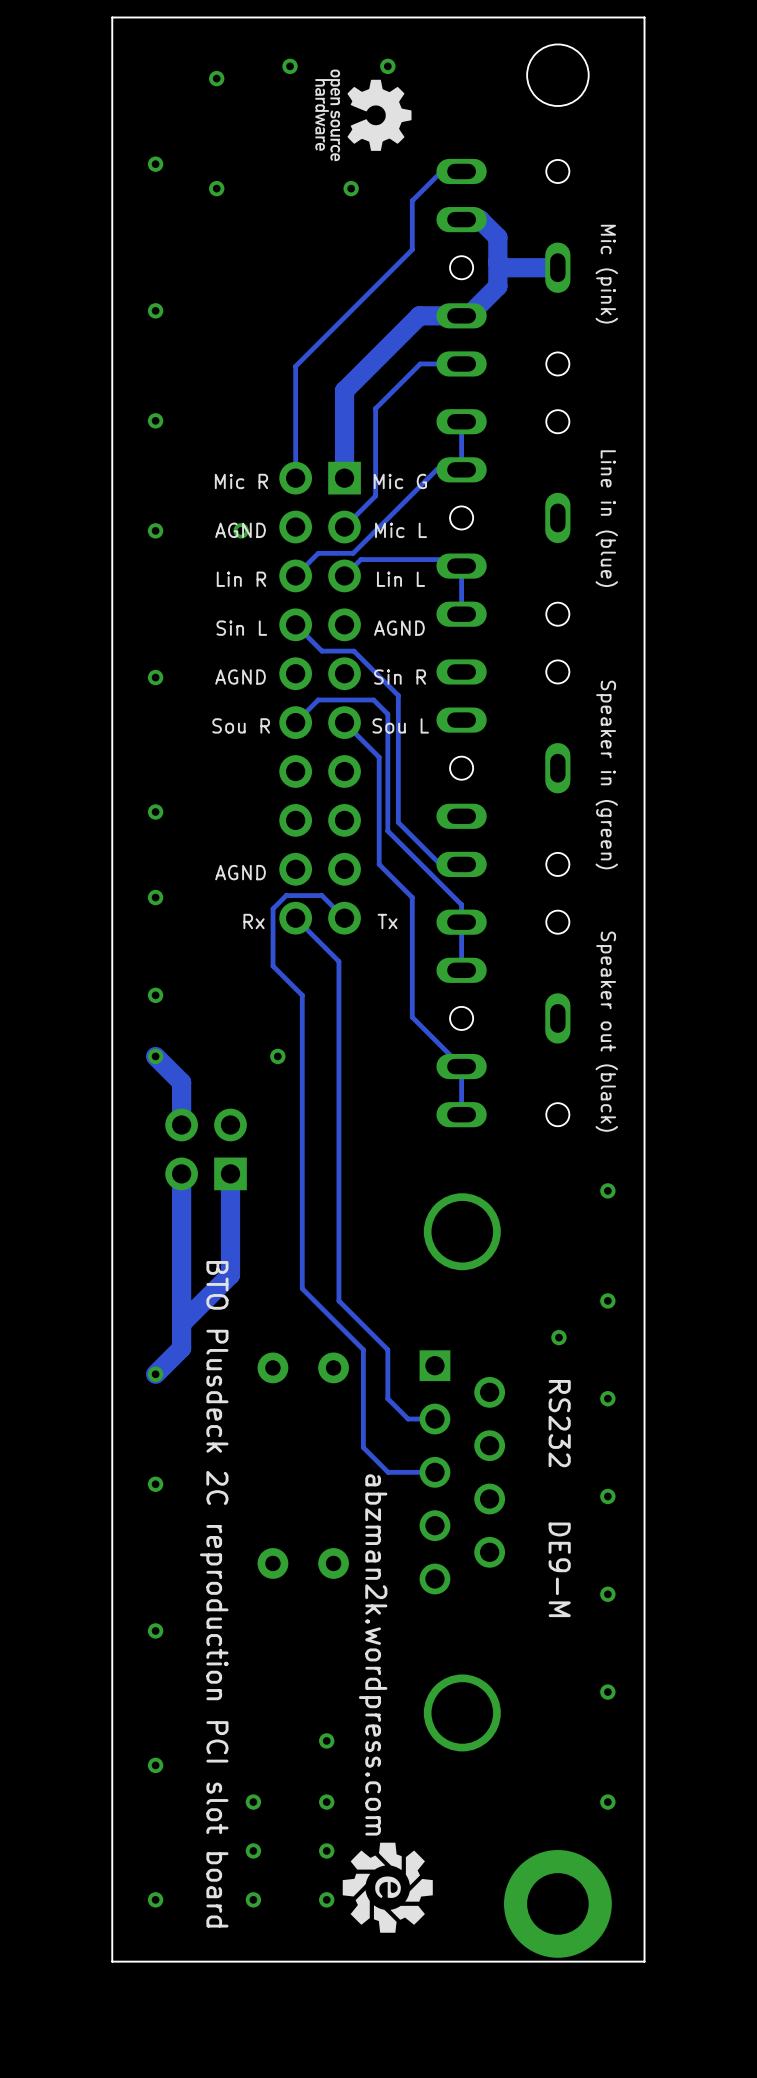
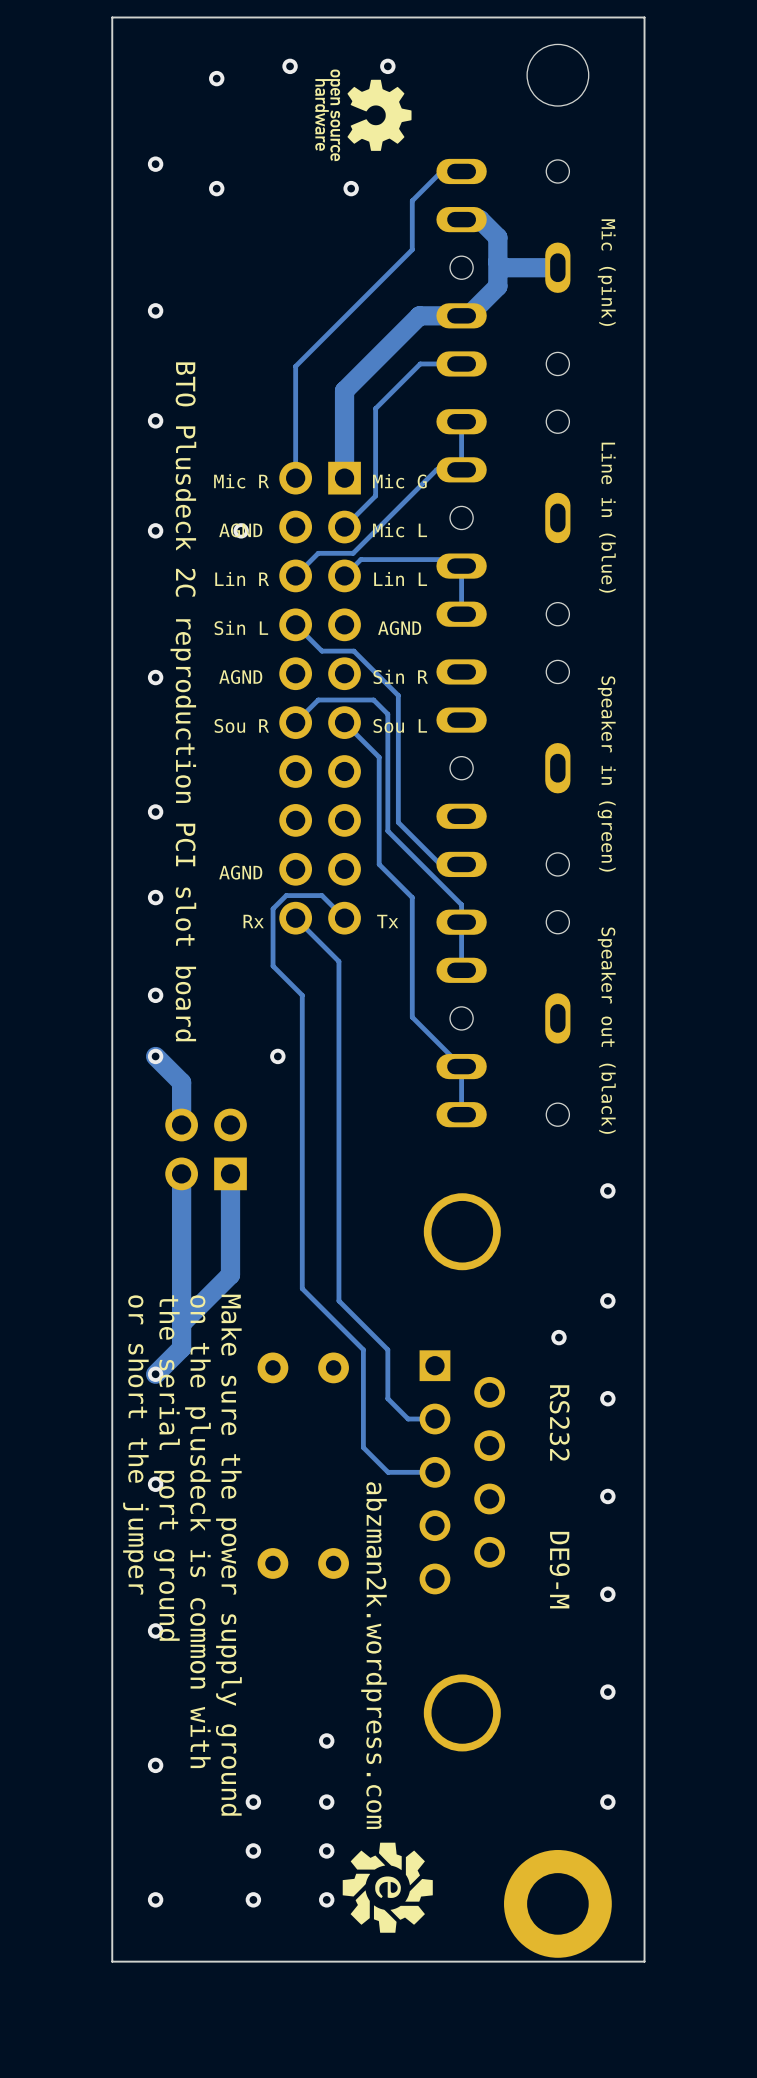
text: none -> BTO Plusdeck 2C reproduction PCI slot board (183, 701)
text: none -> or short the jumper (135, 1444)
text: none -> the serial port ground (166, 1468)
text: none -> on the plusdeck is common with (197, 1531)
text: none -> Make sure the power supply ground (228, 1555)
text: BTO Plusdeck 2C reproduction PCI slot board (214, 1594) -> none

